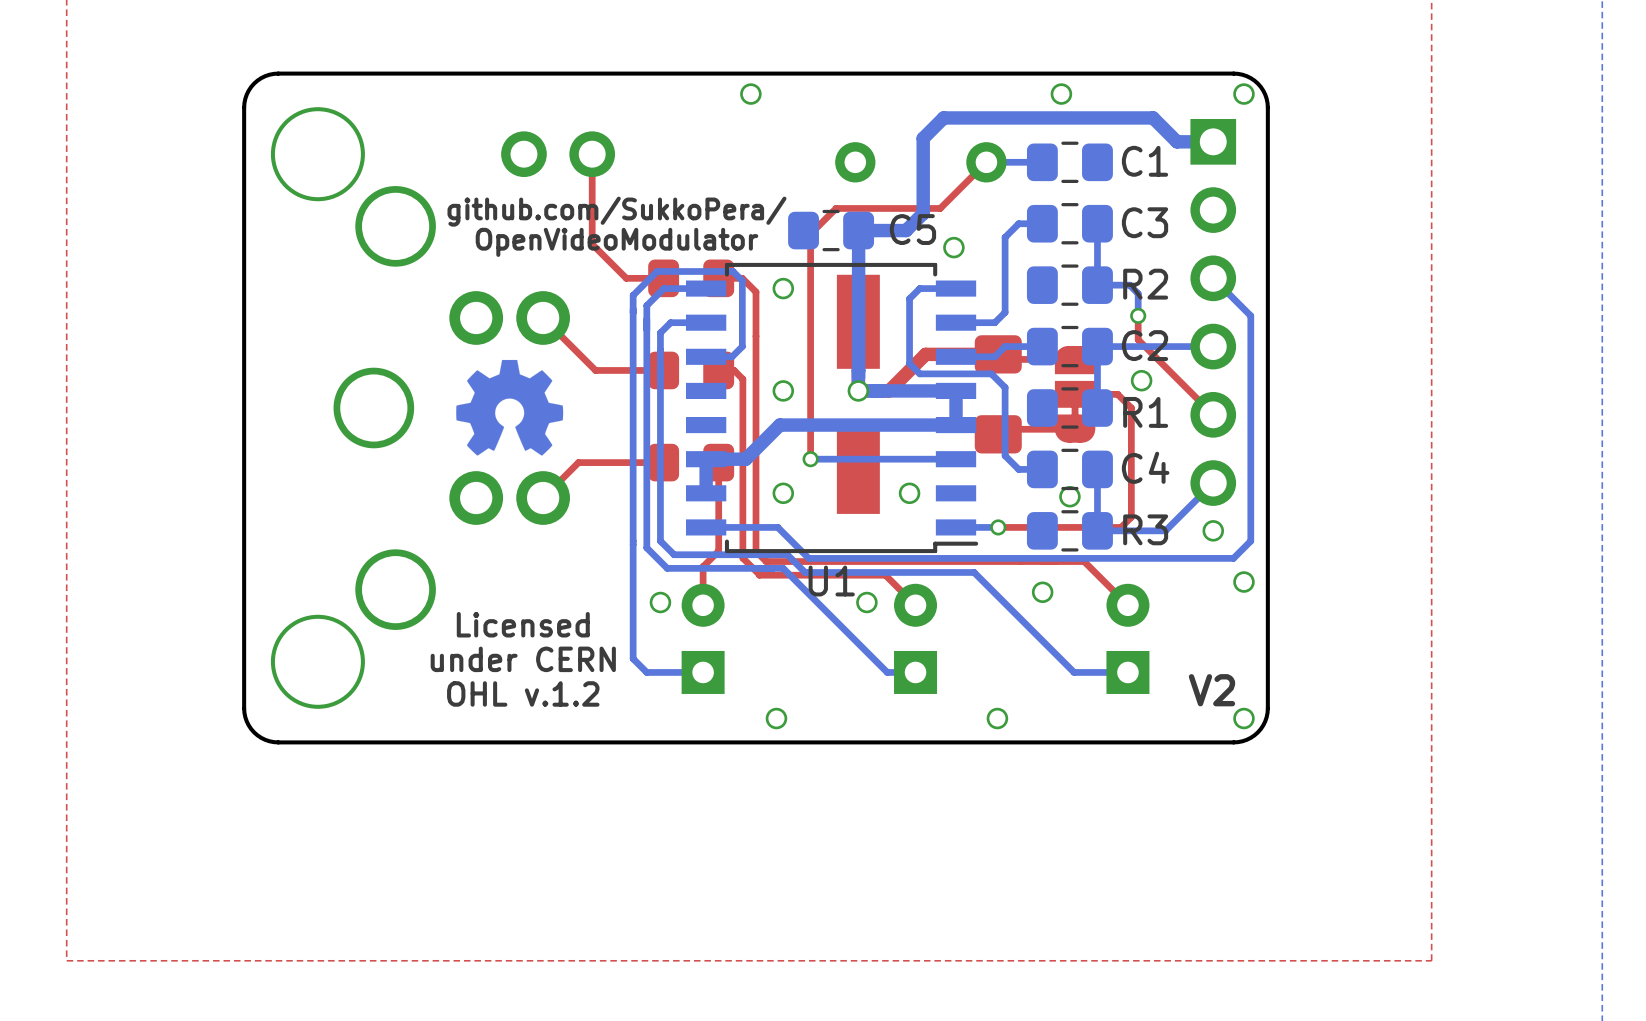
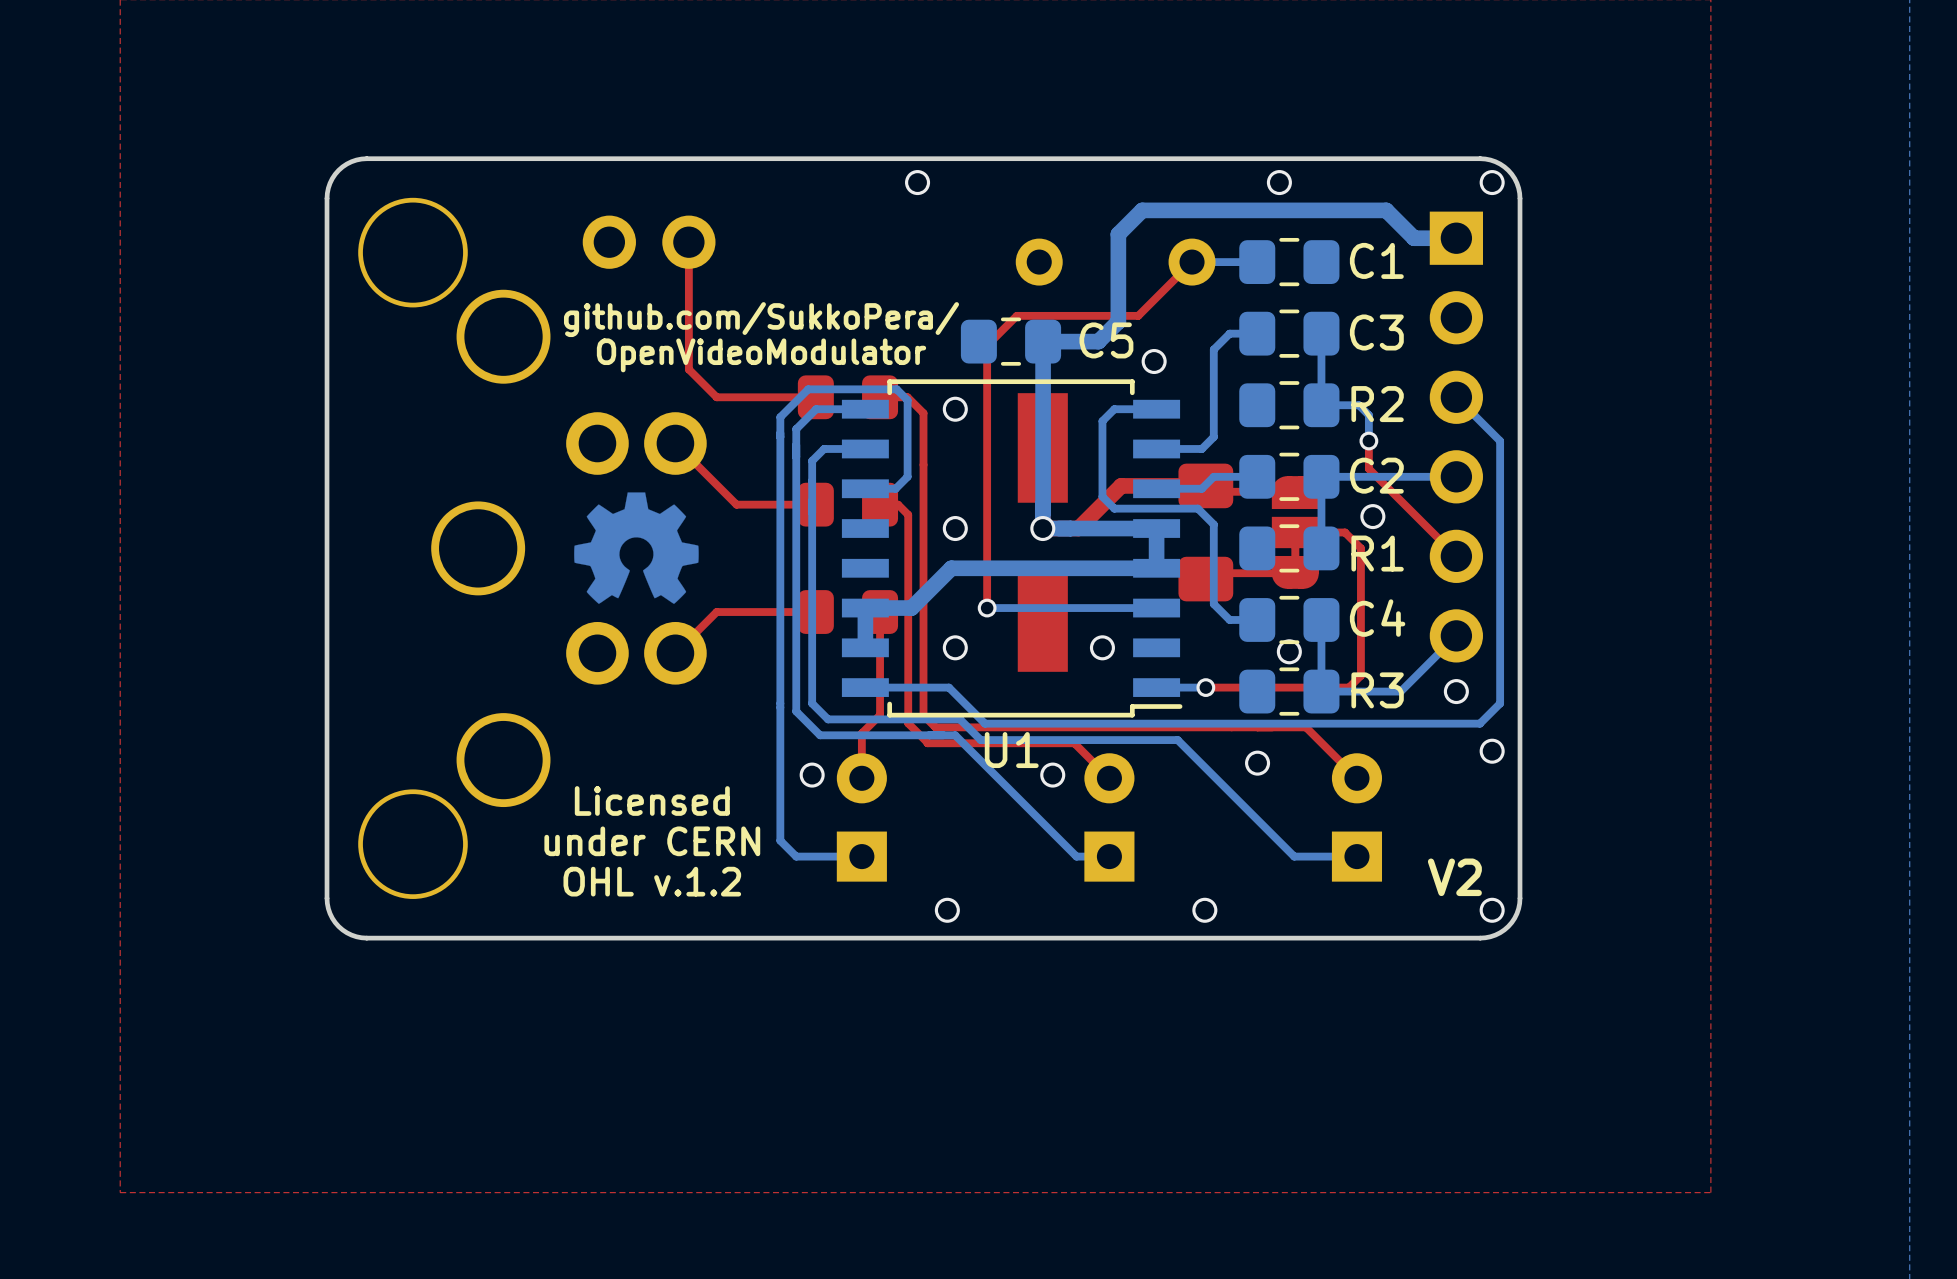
part position: (558, 154) -> (649, 242)
top track: (592, 154) (592, 244) (626, 278) -> (688, 252) (688, 369) (716, 397) (772, 397)

